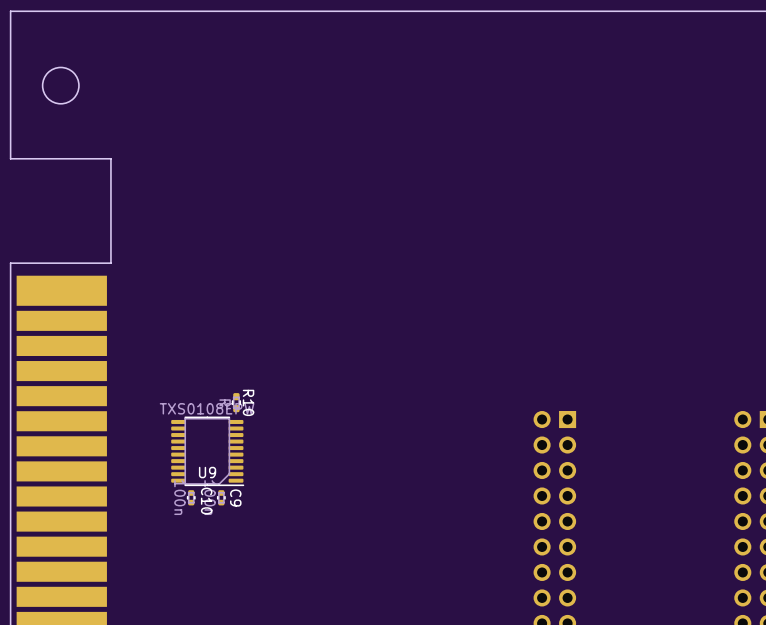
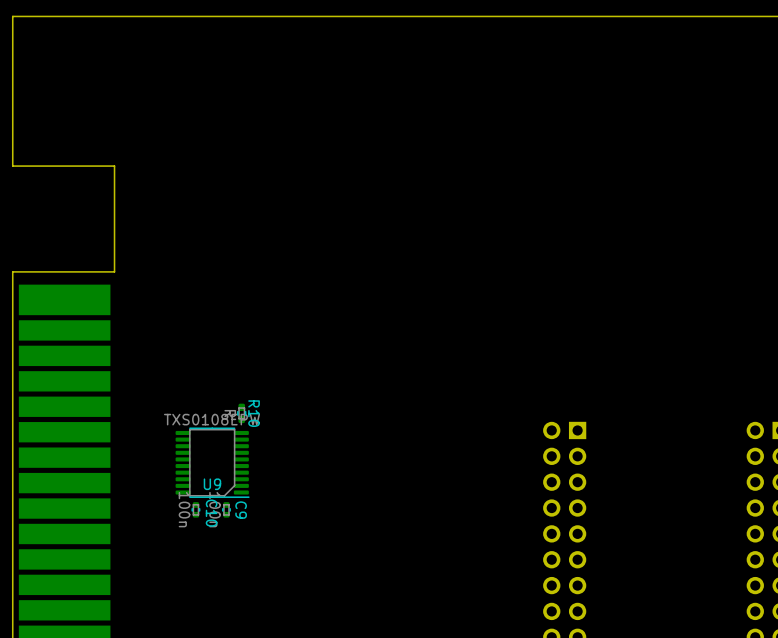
round board edge: [42, 66, 80, 105] -> none

